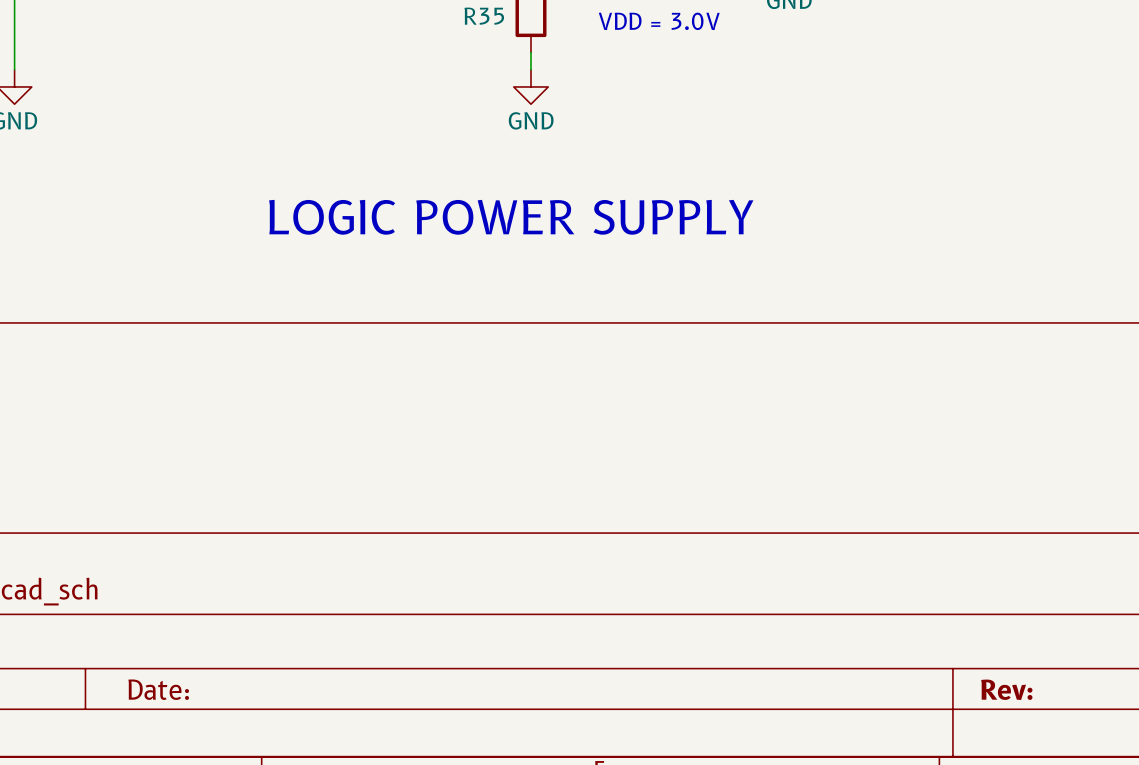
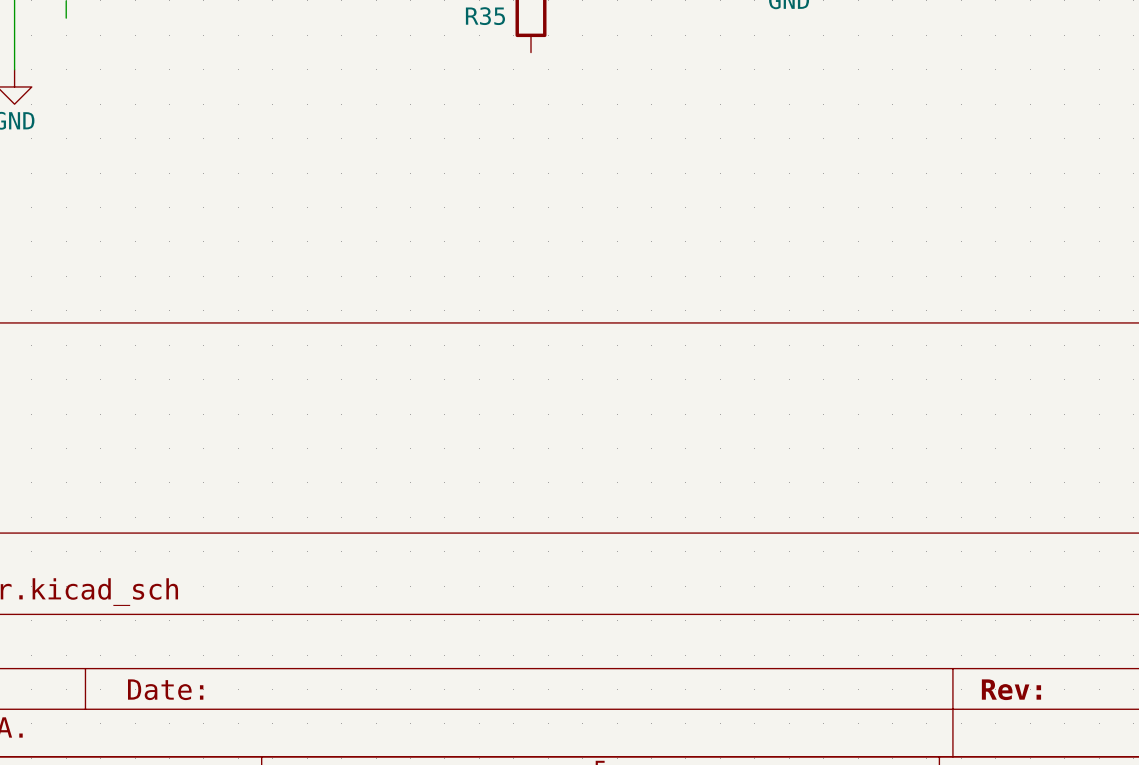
wire: none -> (66, 0) (66, 18)
text: VDD = 3.0V (659, 21) -> none
wire: (531, 52) (531, 69) -> none
power symbol: GND (531, 86) -> none
text: LOGIC POWER SUPPLY (511, 217) -> none

